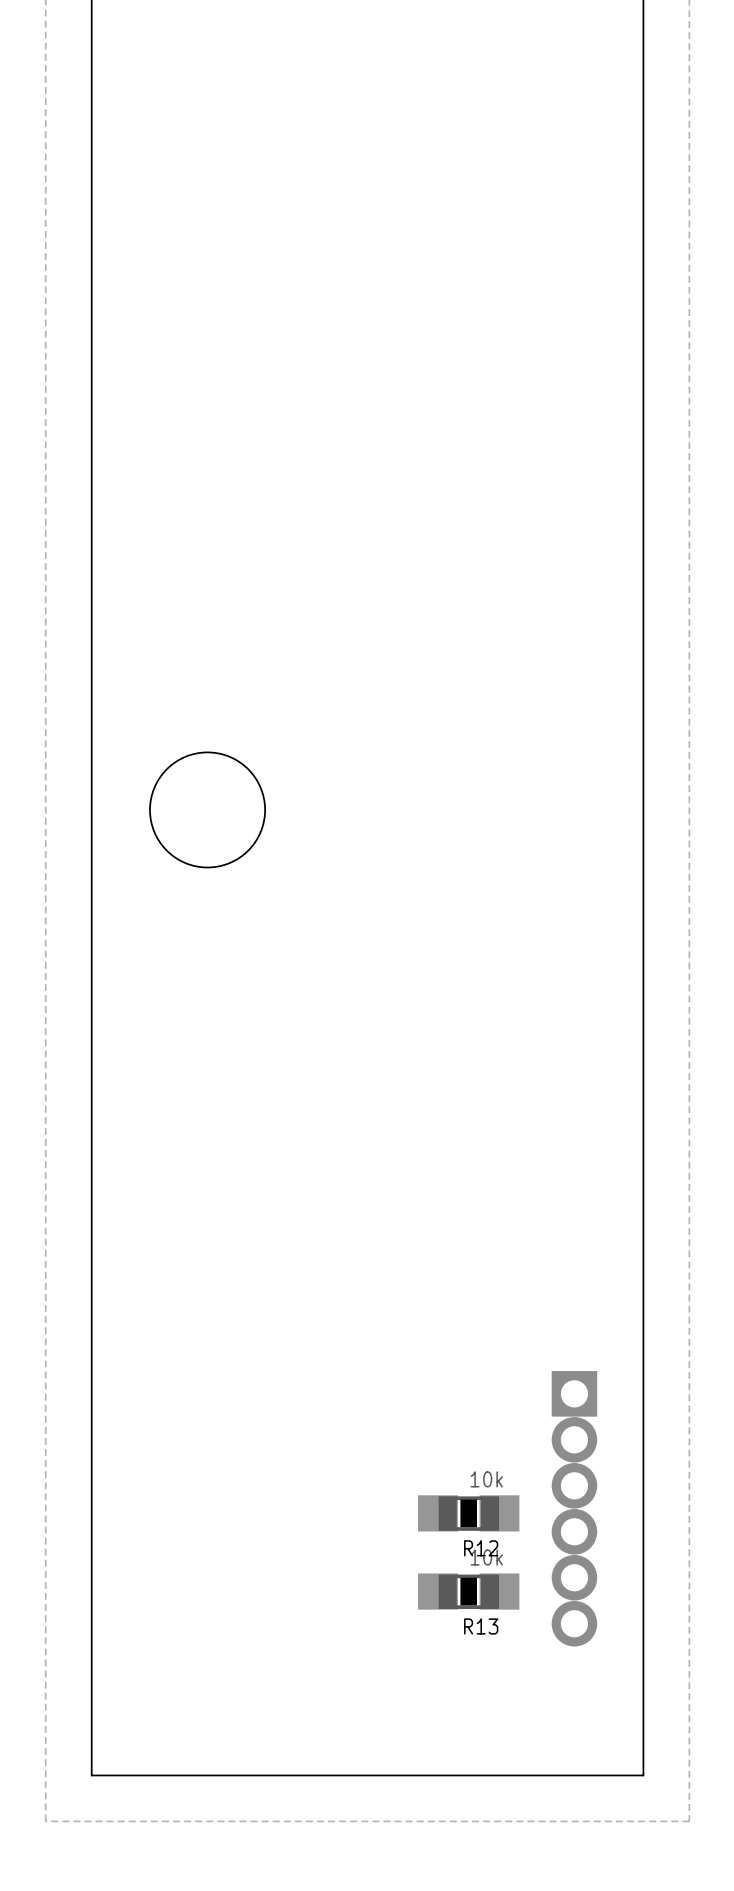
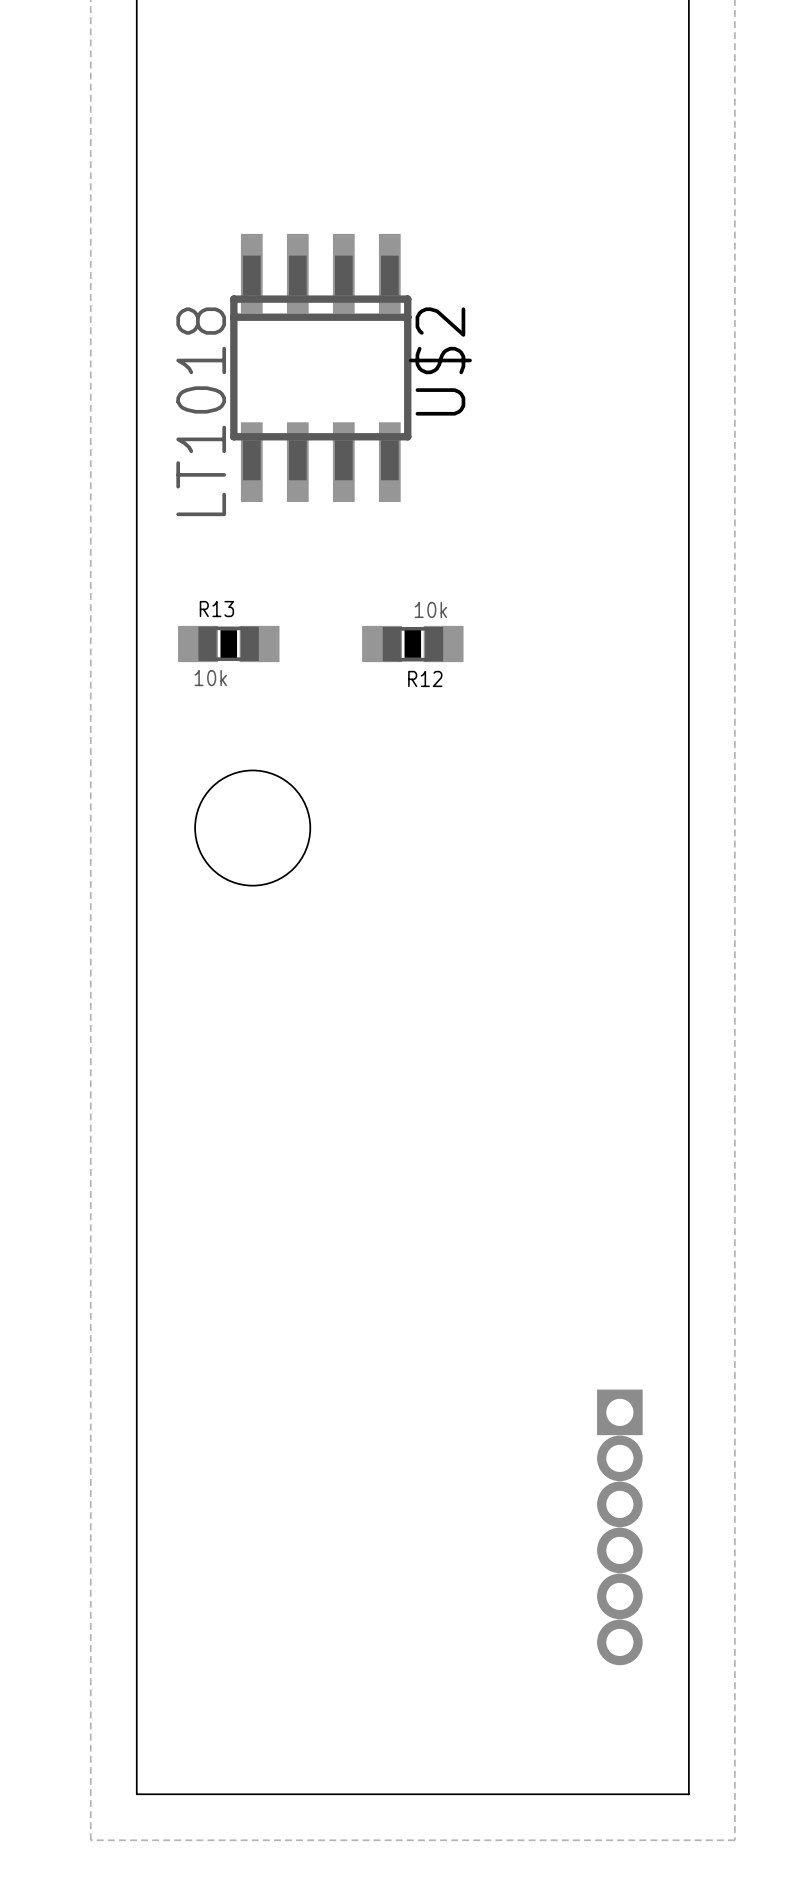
U$2: none -> LT1018 (320, 367)
R12 position: (468, 1513) -> (412, 644)
R13 value position: 10k (486, 1557) -> 10k (210, 678)
R13 position: (468, 1591) -> (228, 644)
R13 name position: R13 (481, 1626) -> R13 (216, 609)

